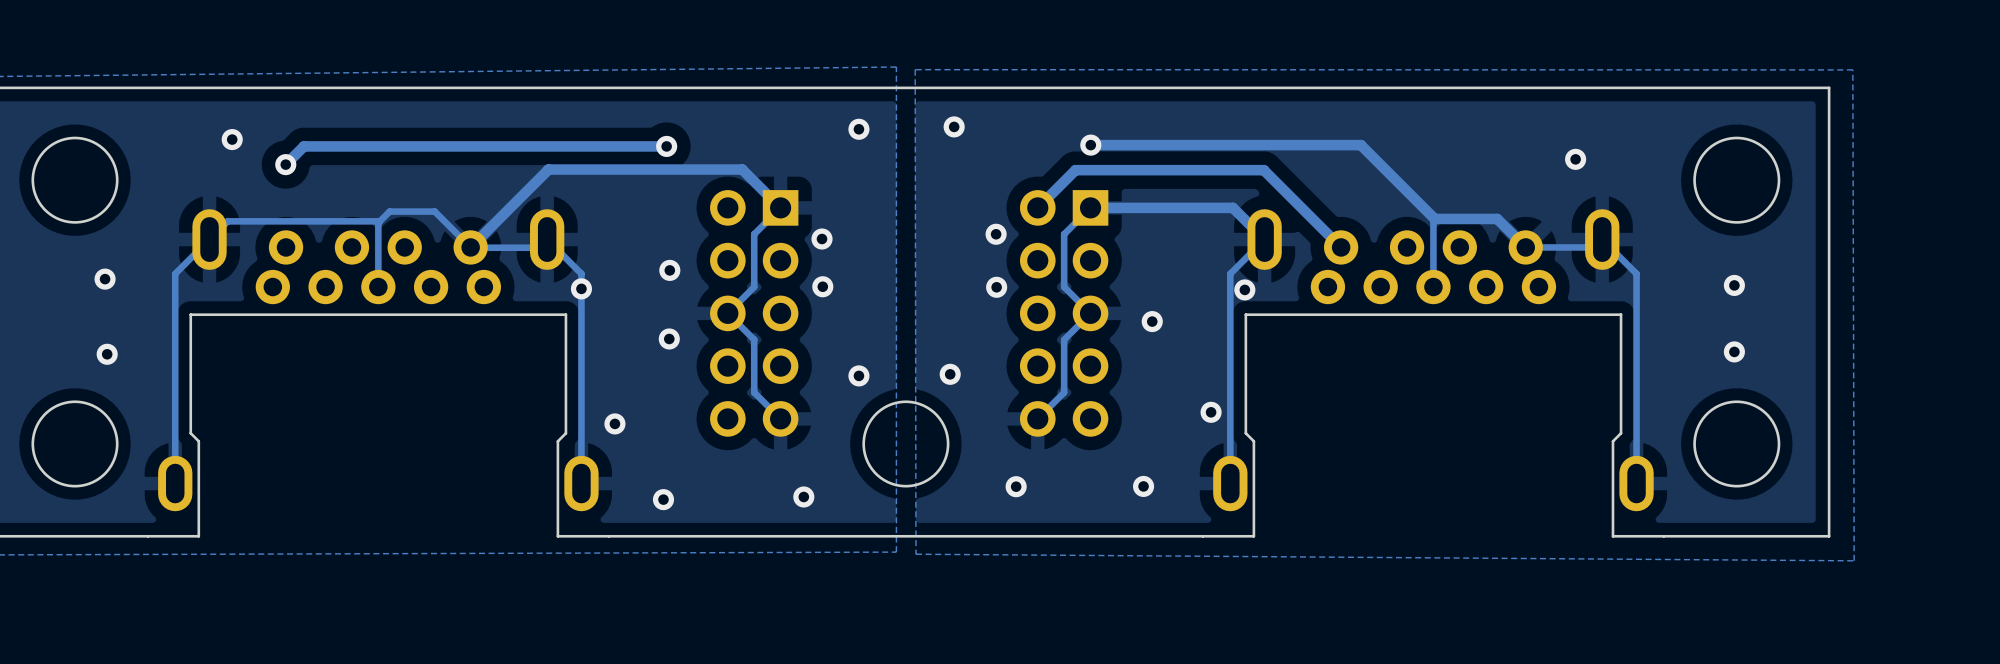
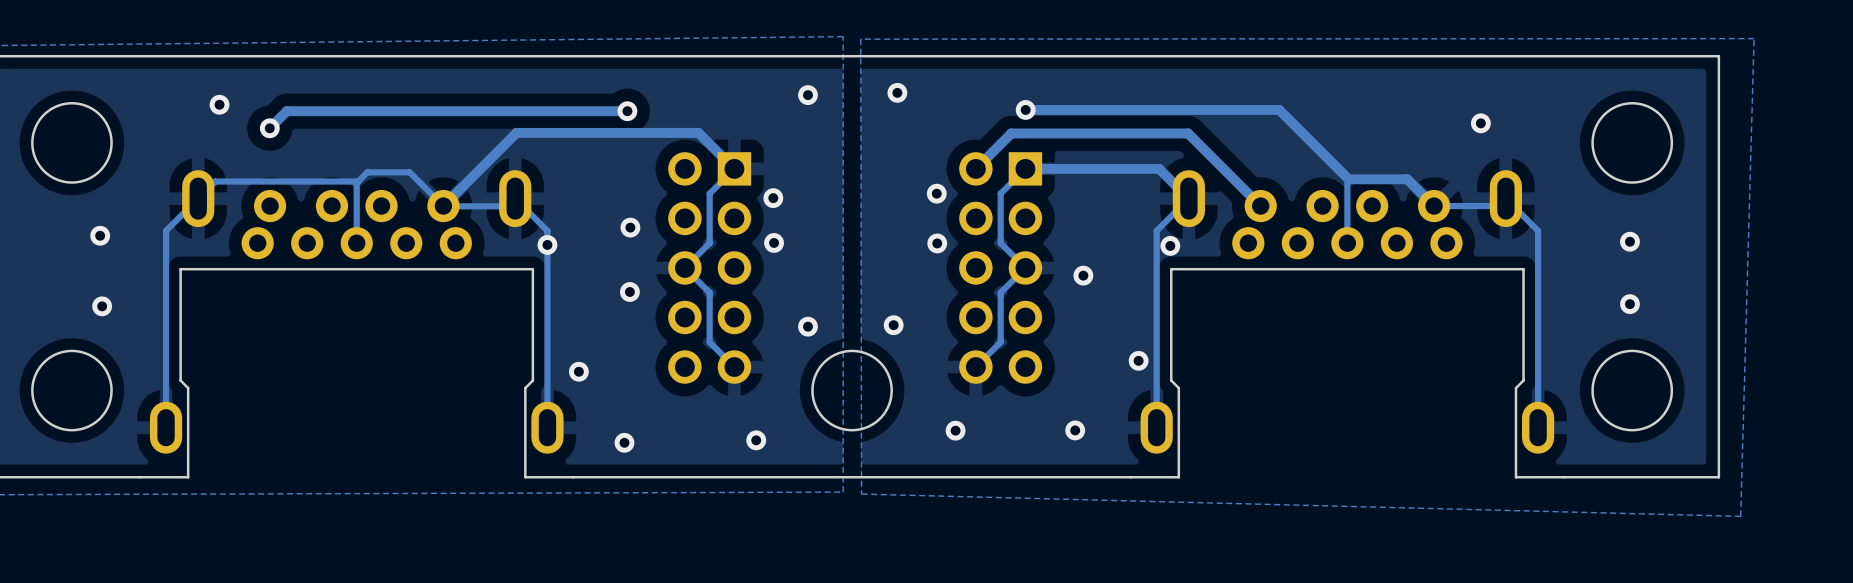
zone outline: (915, 69) (1852, 69) (1854, 560) (915, 554) -> (860, 39) (1754, 38) (1740, 516) (861, 494)

